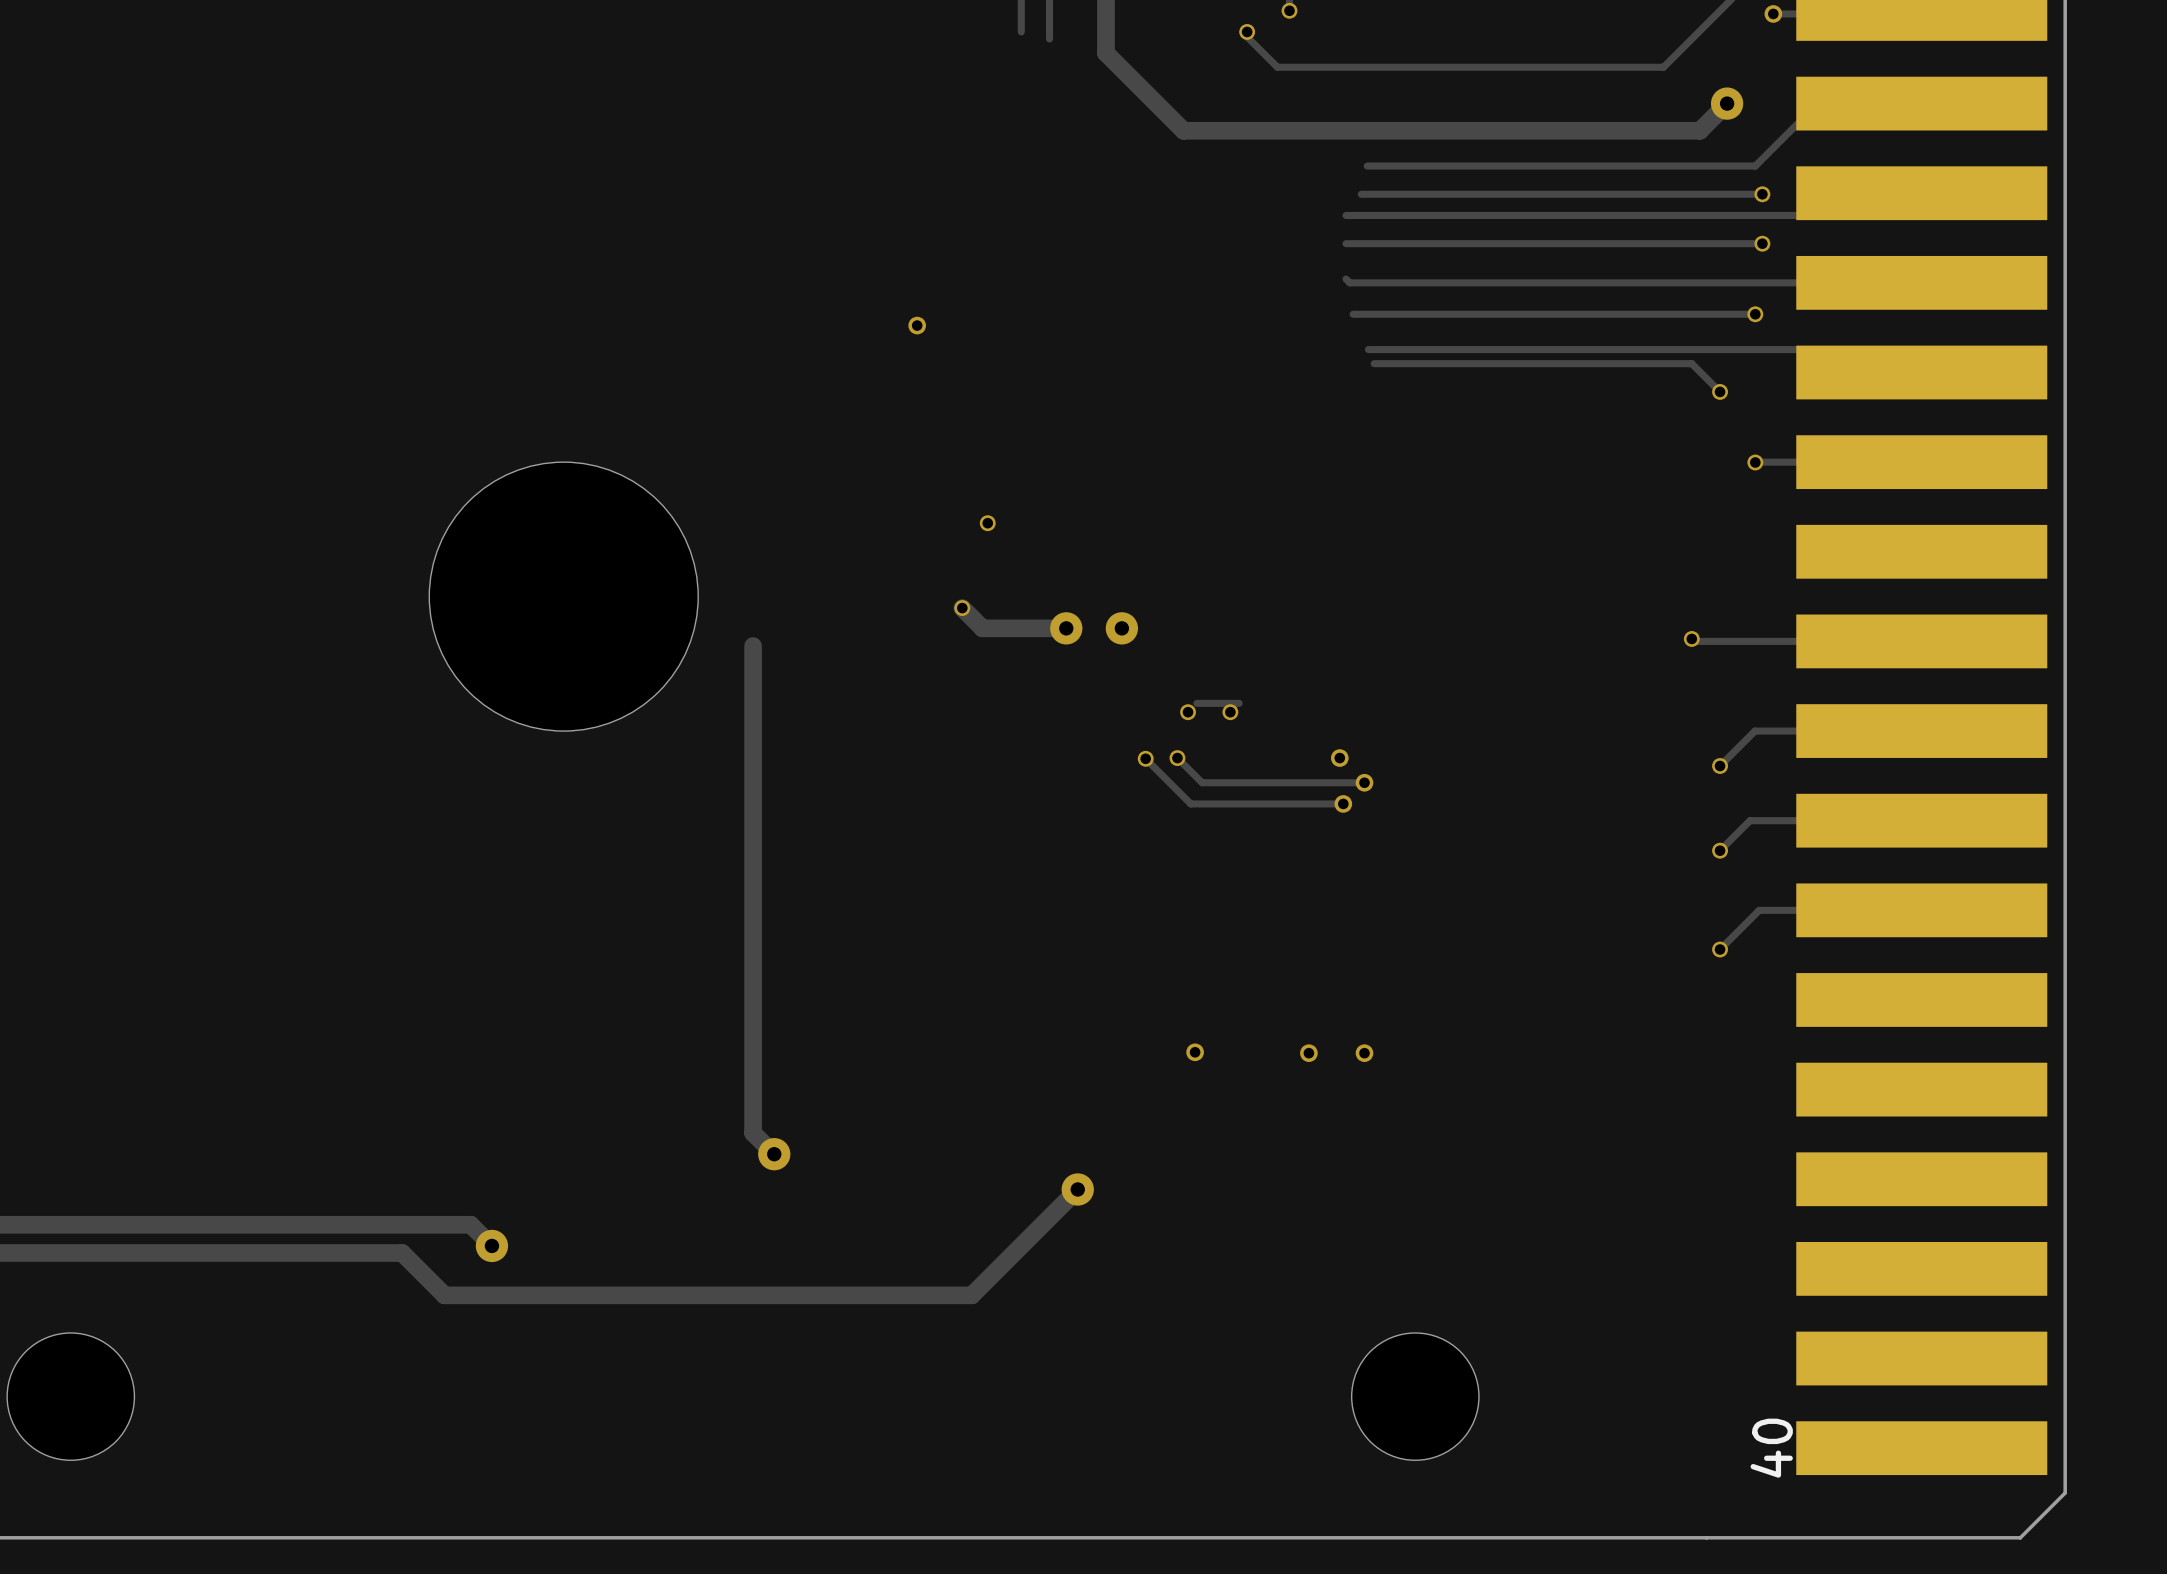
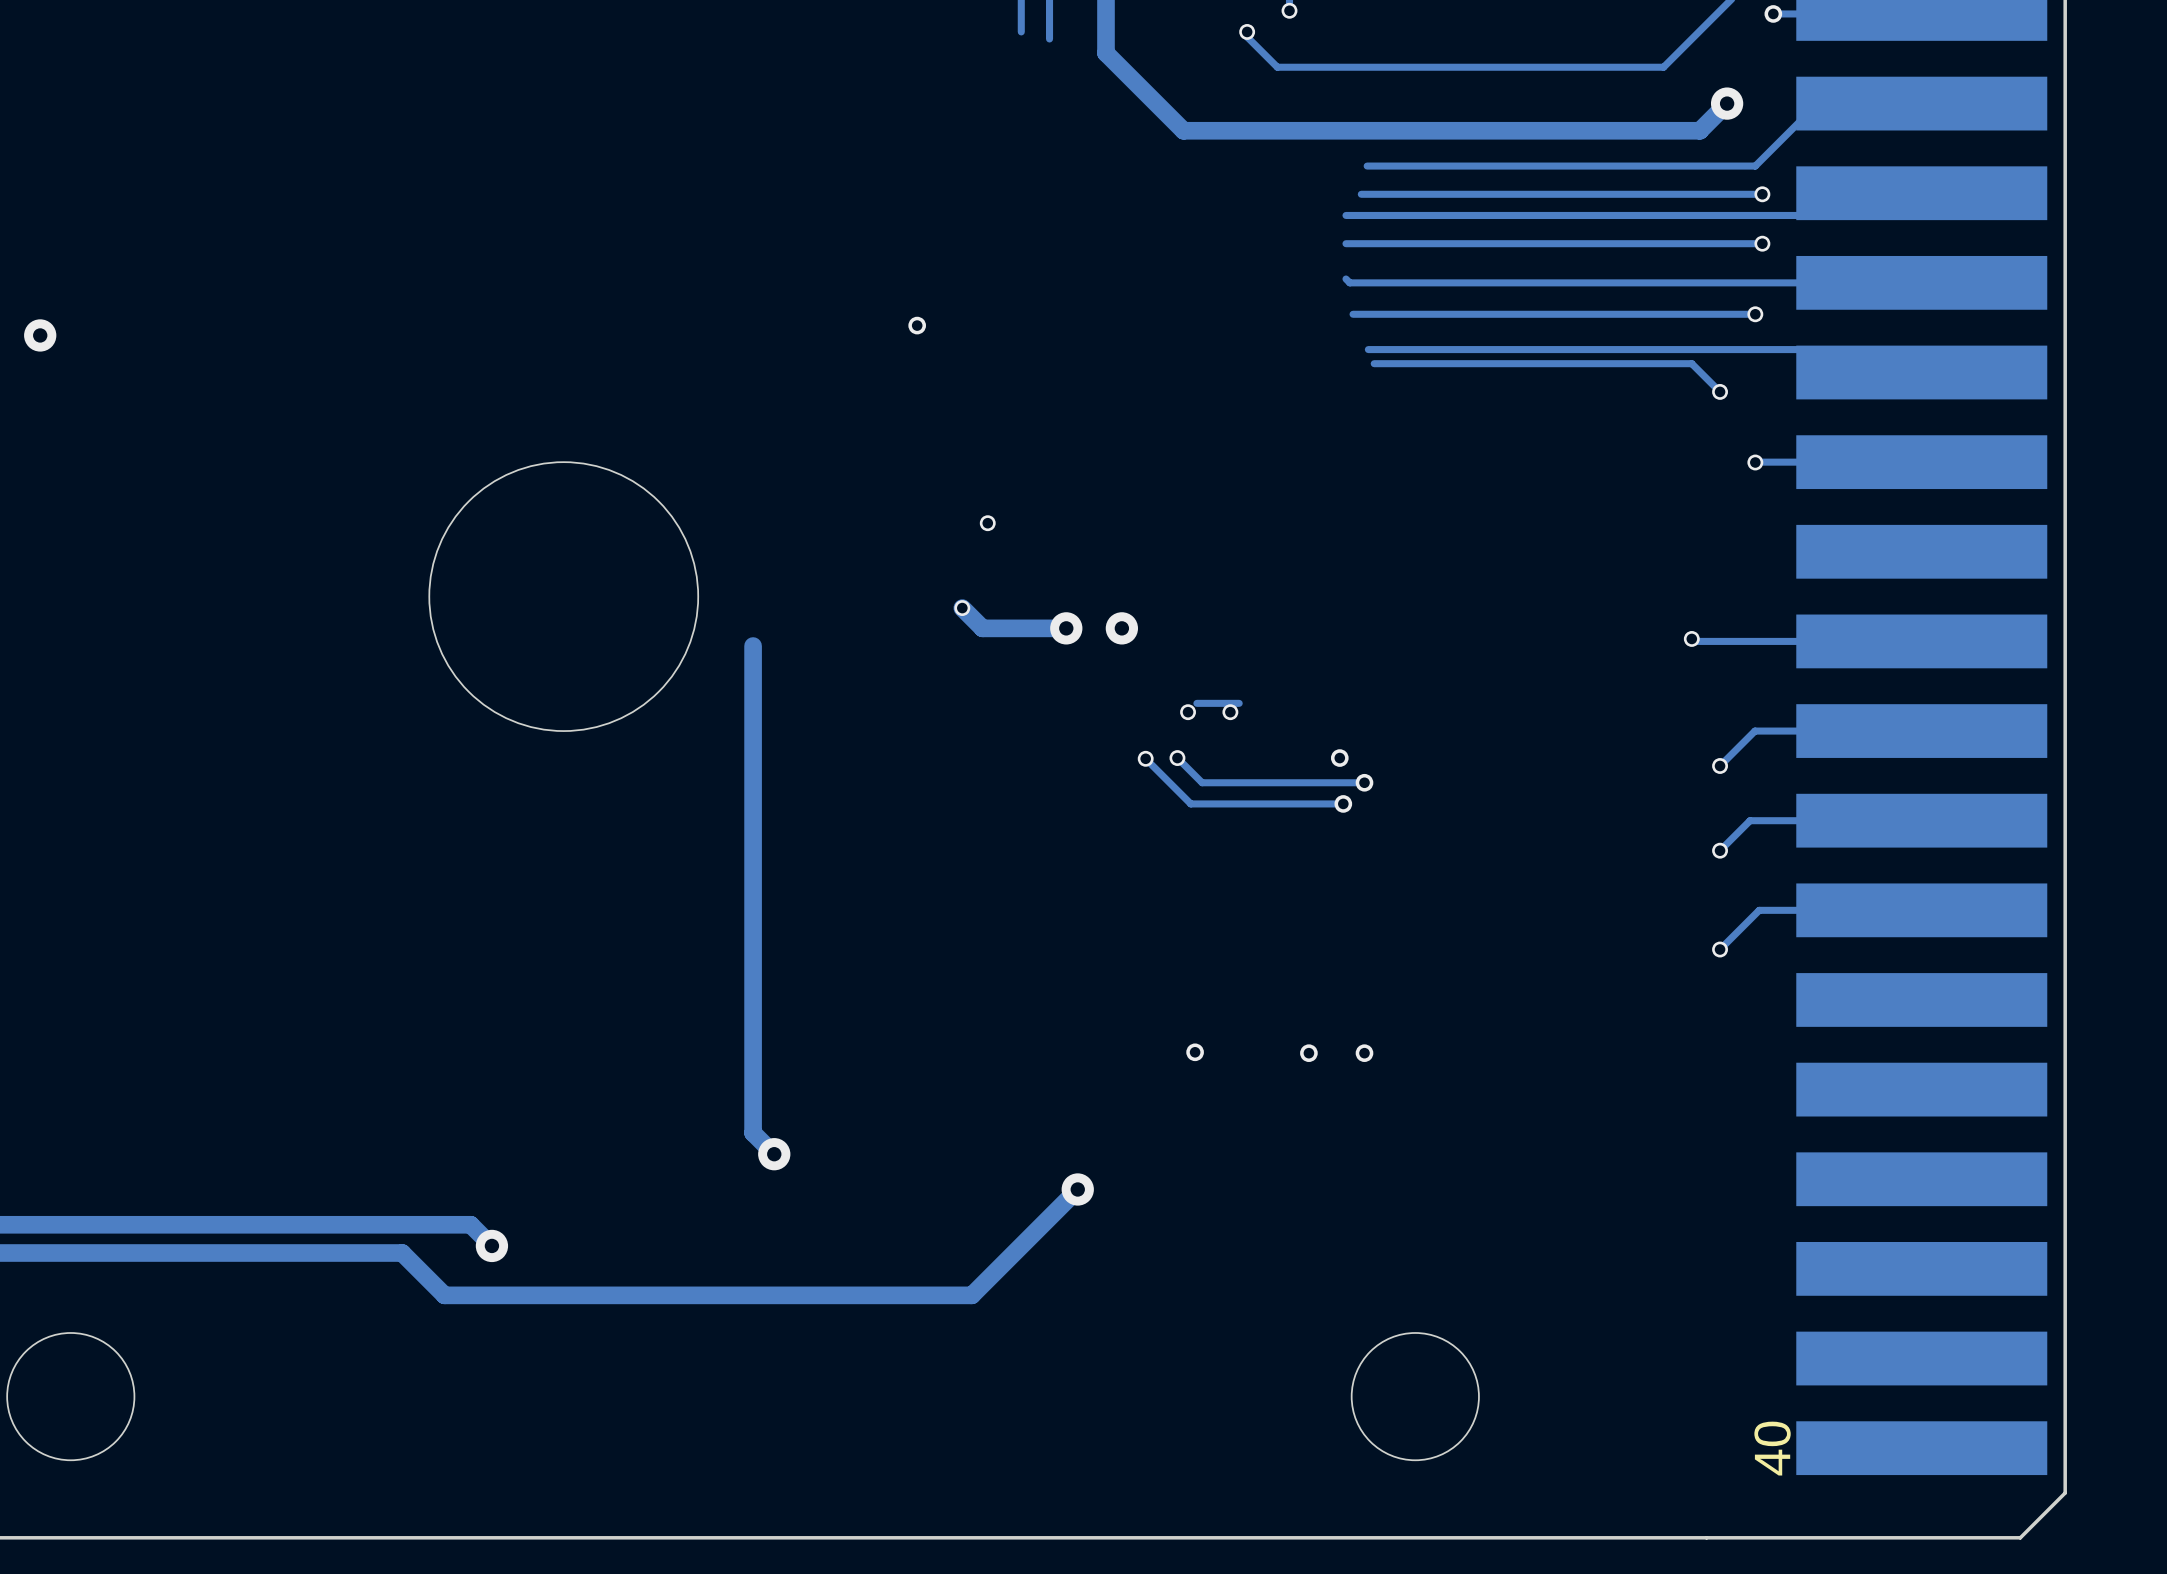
via: none -> (40, 335)

